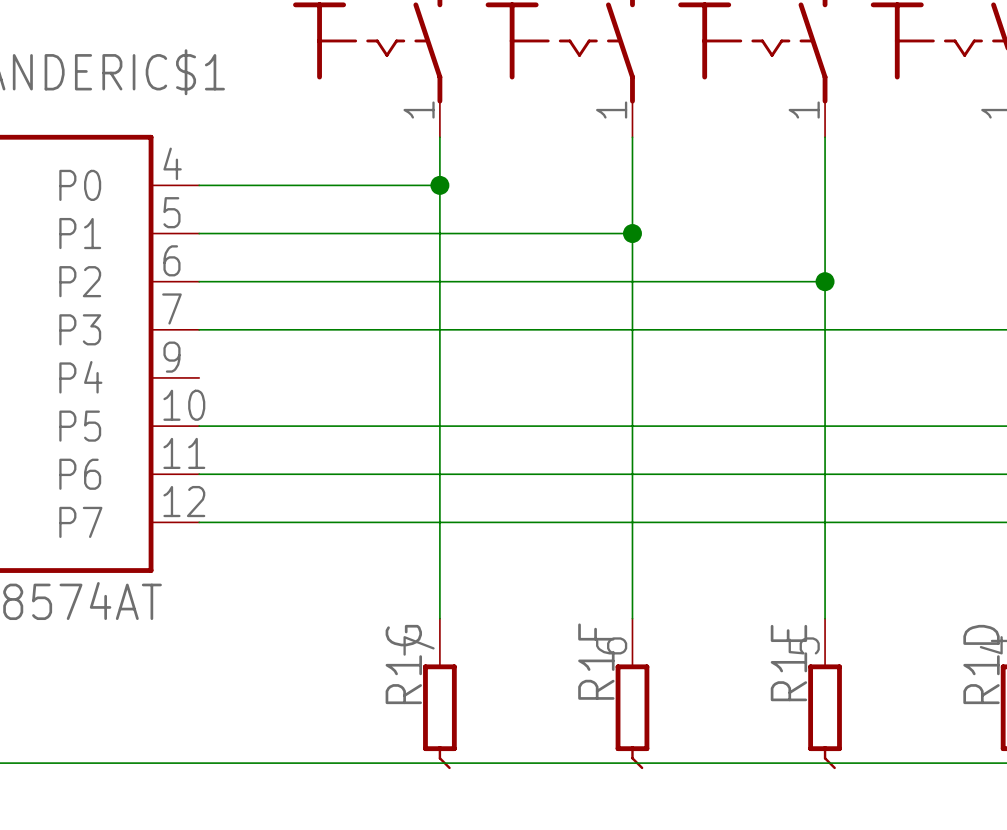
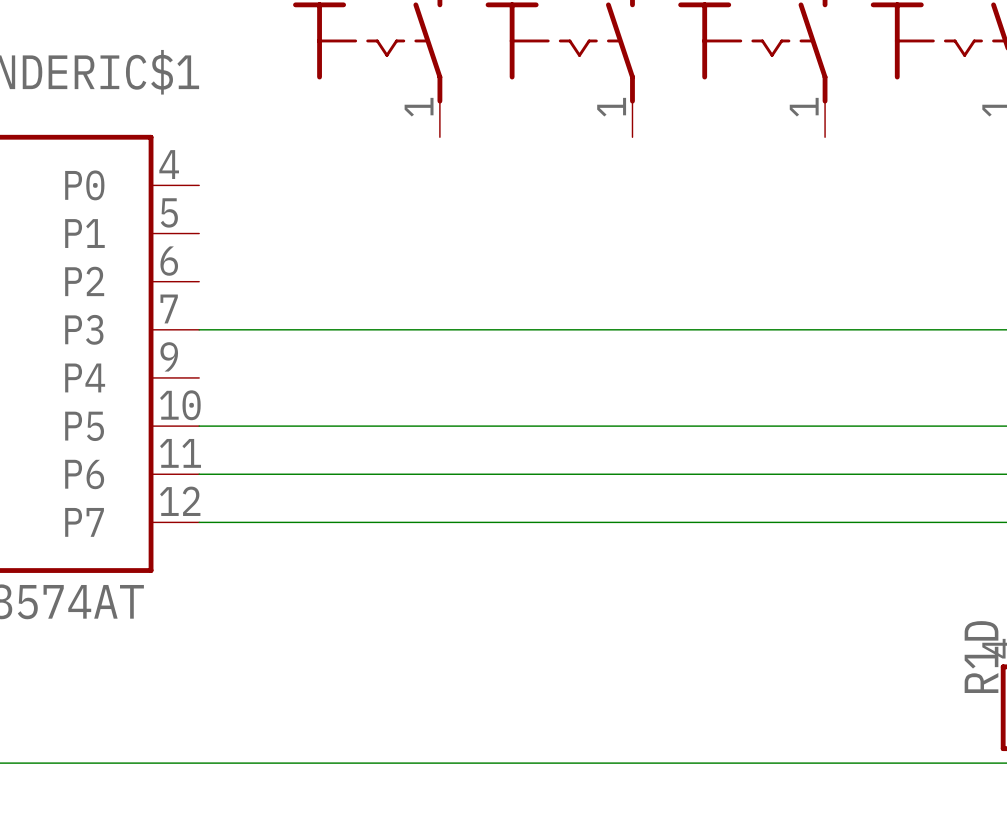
wire: (439, 137) (439, 618) -> none
wire: (632, 137) (632, 618) -> none
wire: (825, 137) (825, 618) -> none
wire: (199, 185) (439, 185) -> none
junction: (439, 185) -> none
wire: (199, 233) (632, 233) -> none
junction: (632, 233) -> none
wire: (199, 281) (825, 281) -> none
junction: (825, 281) -> none
R1G: (439, 693) -> none
R1F: (632, 693) -> none
R1E: (825, 693) -> none

